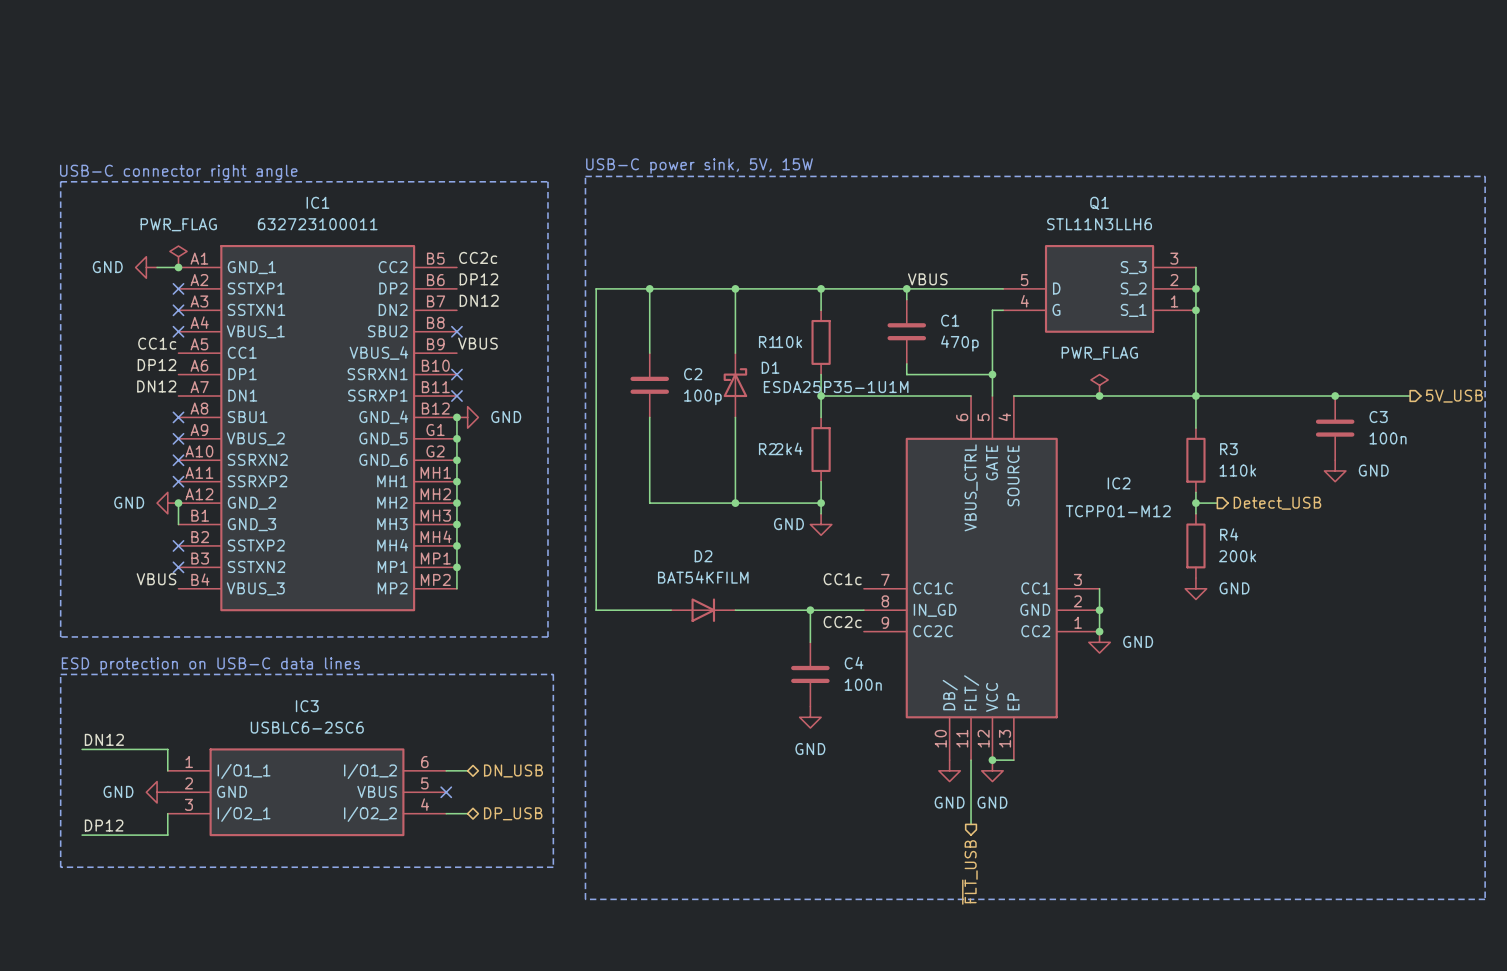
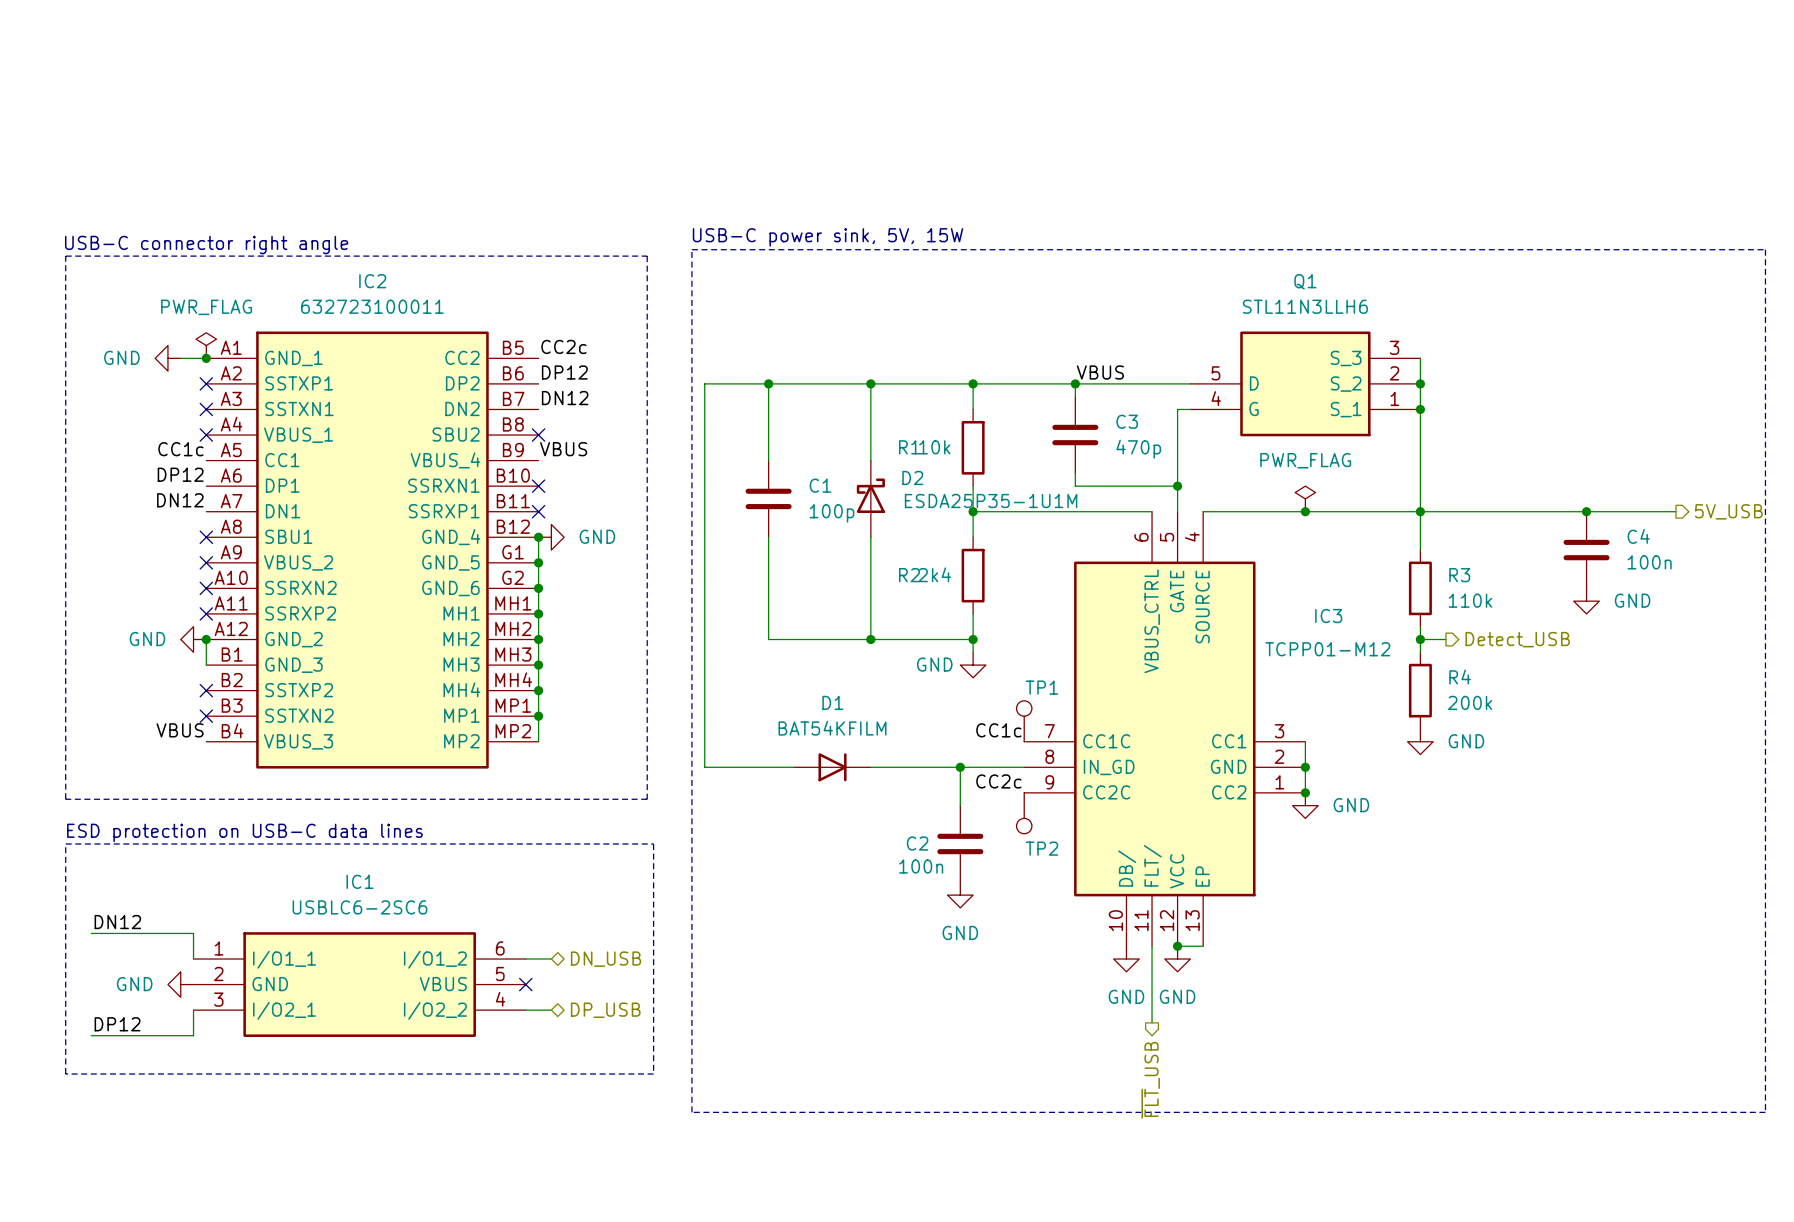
IC1 name: IC1 (317, 202) -> IC2 (372, 281)
C1 name: C1 (950, 320) -> C3 (1127, 421)
D1 name: D1 (770, 367) -> D2 (912, 478)
C2 name: C2 (693, 374) -> C1 (820, 485)
C3 name: C3 (1378, 417) -> C4 (1638, 536)
IC2 name: IC2 (1119, 483) -> IC3 (1328, 616)
D2 name: D2 (703, 556) -> D1 (832, 702)
TP1: none -> (1024, 721)
TP2: none -> (1024, 813)
C4 name: C4 (854, 663) -> C2 (917, 843)
C4 value position: 100n (863, 684) -> 100n (921, 866)
IC3 name: IC3 (307, 706) -> IC1 (359, 881)

